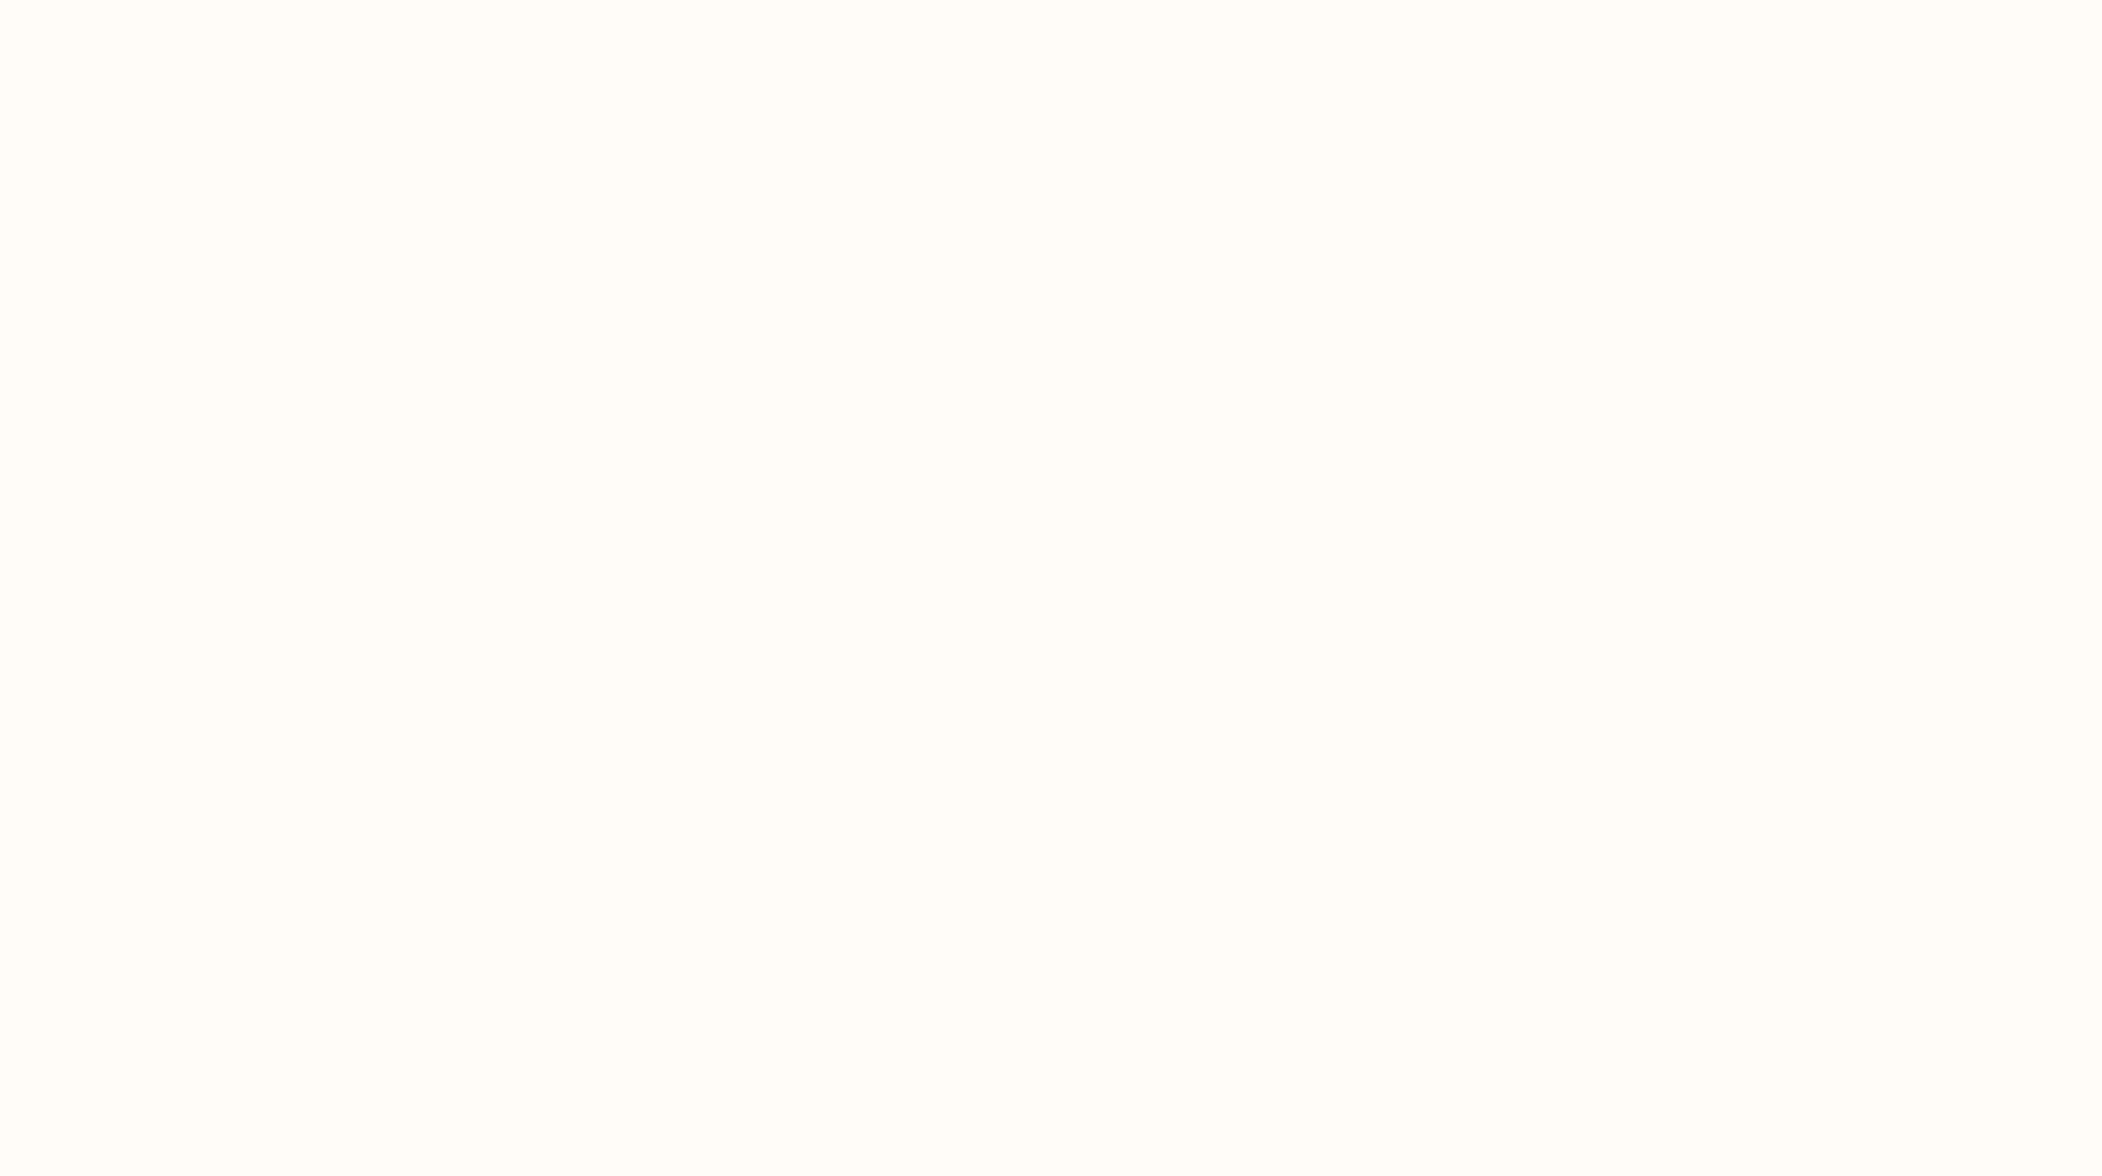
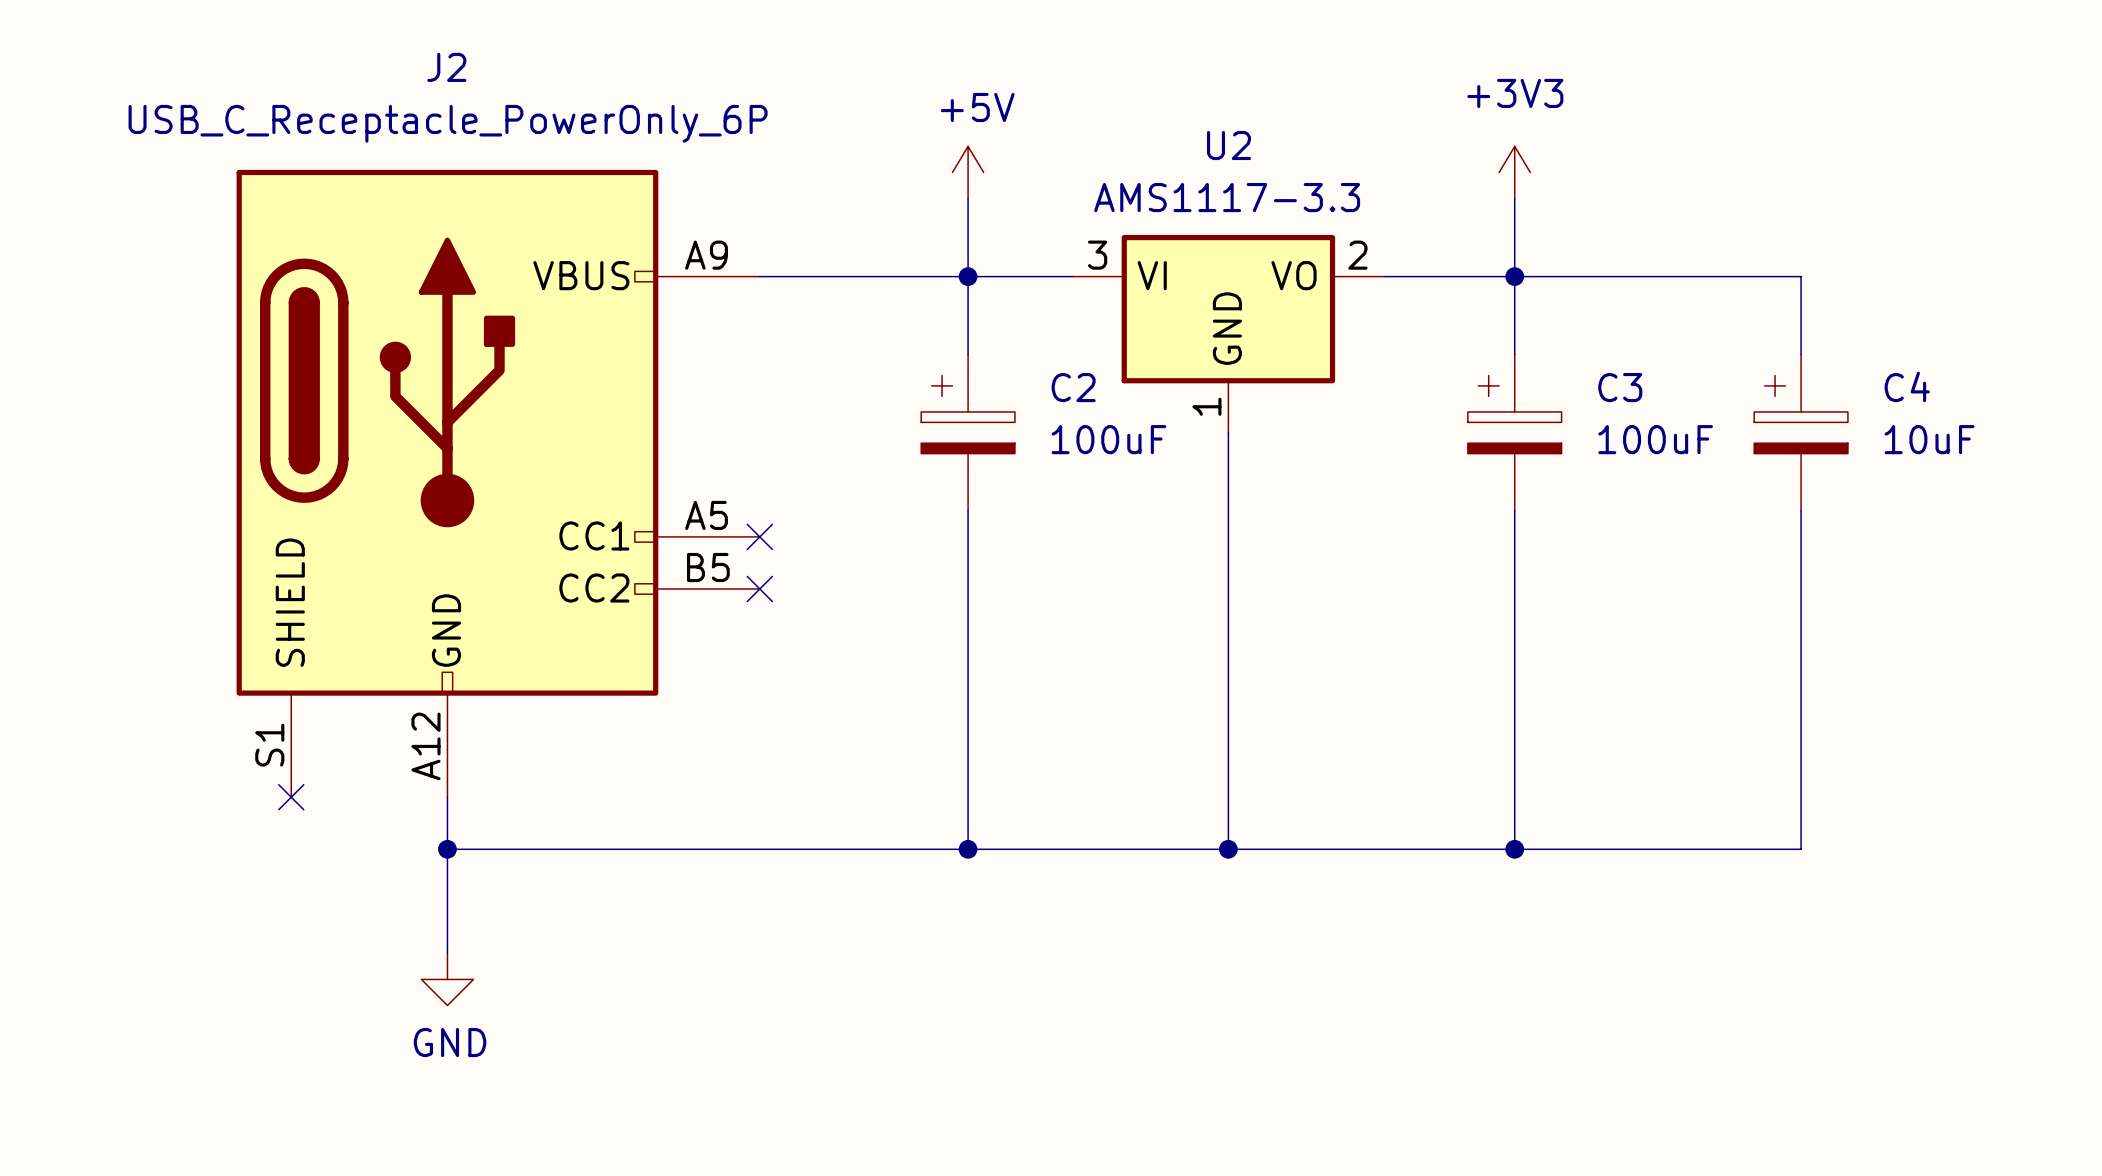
power symbol: none -> +5V (968, 172)
power symbol: none -> +3V3 (1514, 172)
wire: none -> (968, 198) (968, 354)
wire: none -> (1514, 198) (1514, 354)
wire: none -> (759, 276) (1072, 276)
junction: none -> (968, 276)
wire: none -> (1384, 276) (1801, 276) (1801, 354)
junction: none -> (1514, 276)
U2: none -> AMS1117-3.3 (1228, 333)
C2: none -> 100uF (968, 432)
wire: none -> (1228, 432) (1228, 849)
C3: none -> 100uF (1514, 432)
C4: none -> 10uF (1801, 432)
J2: none -> USB_C_Receptacle_PowerOnly_6P (498, 483)
wire: none -> (968, 510) (968, 849)
wire: none -> (1514, 510) (1514, 849)
wire: none -> (1801, 510) (1801, 849) (447, 849)
no-connect mark: none -> (759, 536)
no-connect mark: none -> (759, 588)
no-connect mark: none -> (291, 797)
wire: none -> (447, 797) (447, 953)
junction: none -> (447, 849)
junction: none -> (968, 849)
junction: none -> (1228, 849)
junction: none -> (1514, 849)
power symbol: none -> GND (447, 979)

